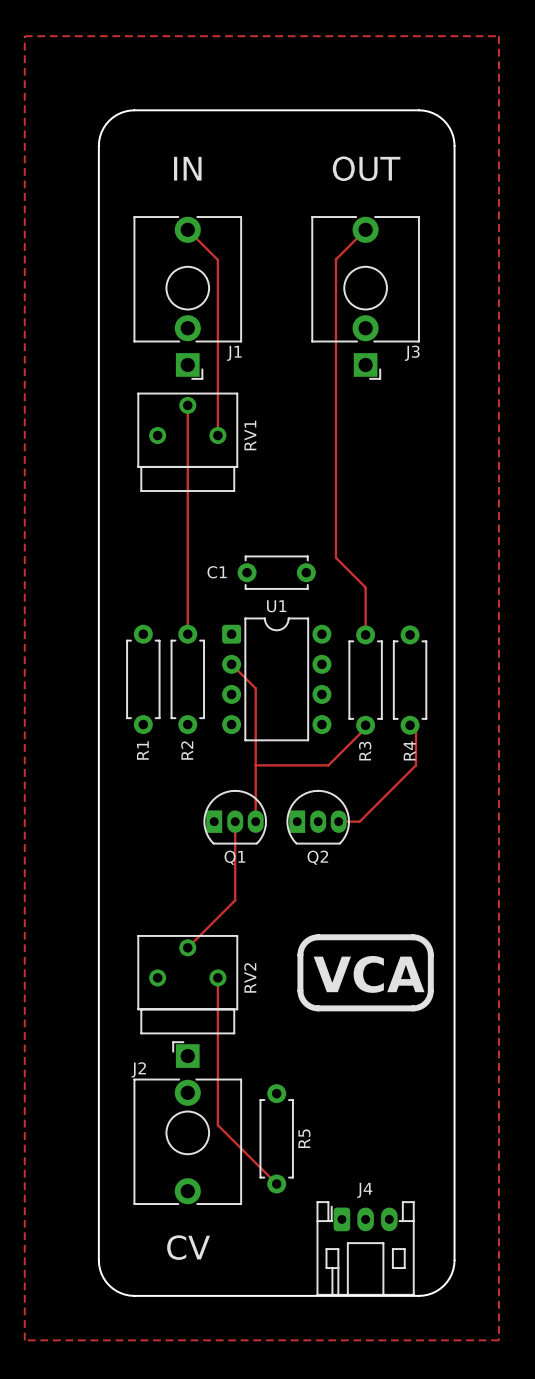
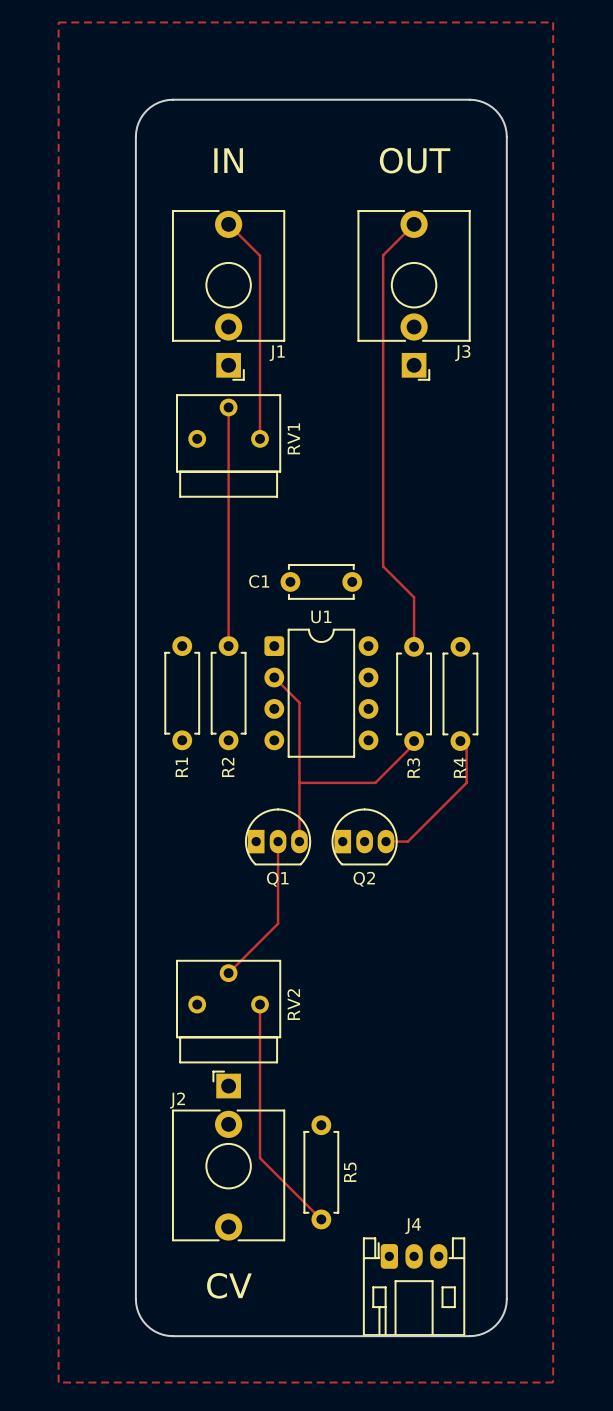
line: (318, 937) (413, 937) (421, 939) (428, 946) (430, 952) (430, 990) (428, 999) (421, 1006) (413, 1008) (318, 1008) (309, 1006) (302, 999) (300, 992) (300, 952) (307, 940) (318, 937) -> none
text: VCA (369, 974) -> none

